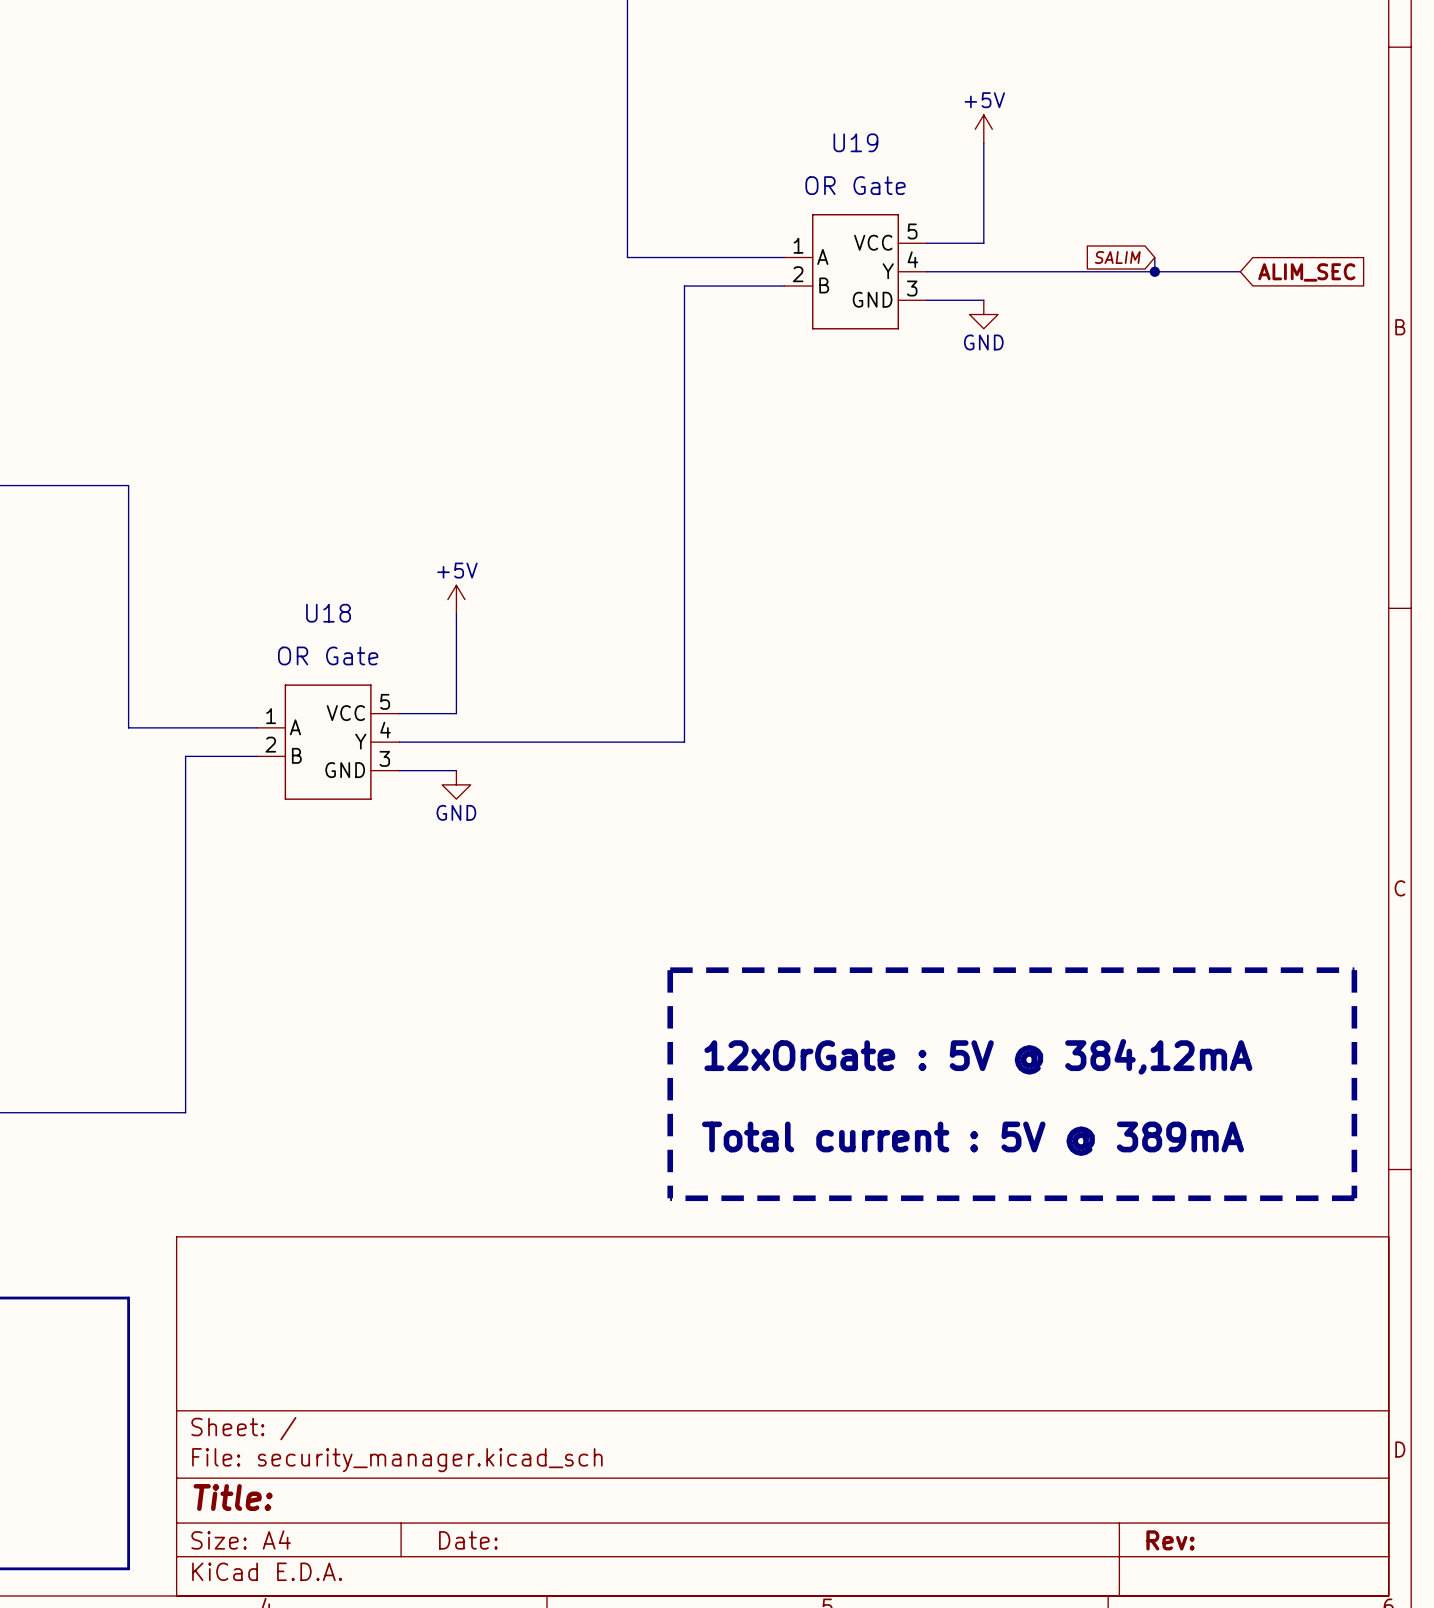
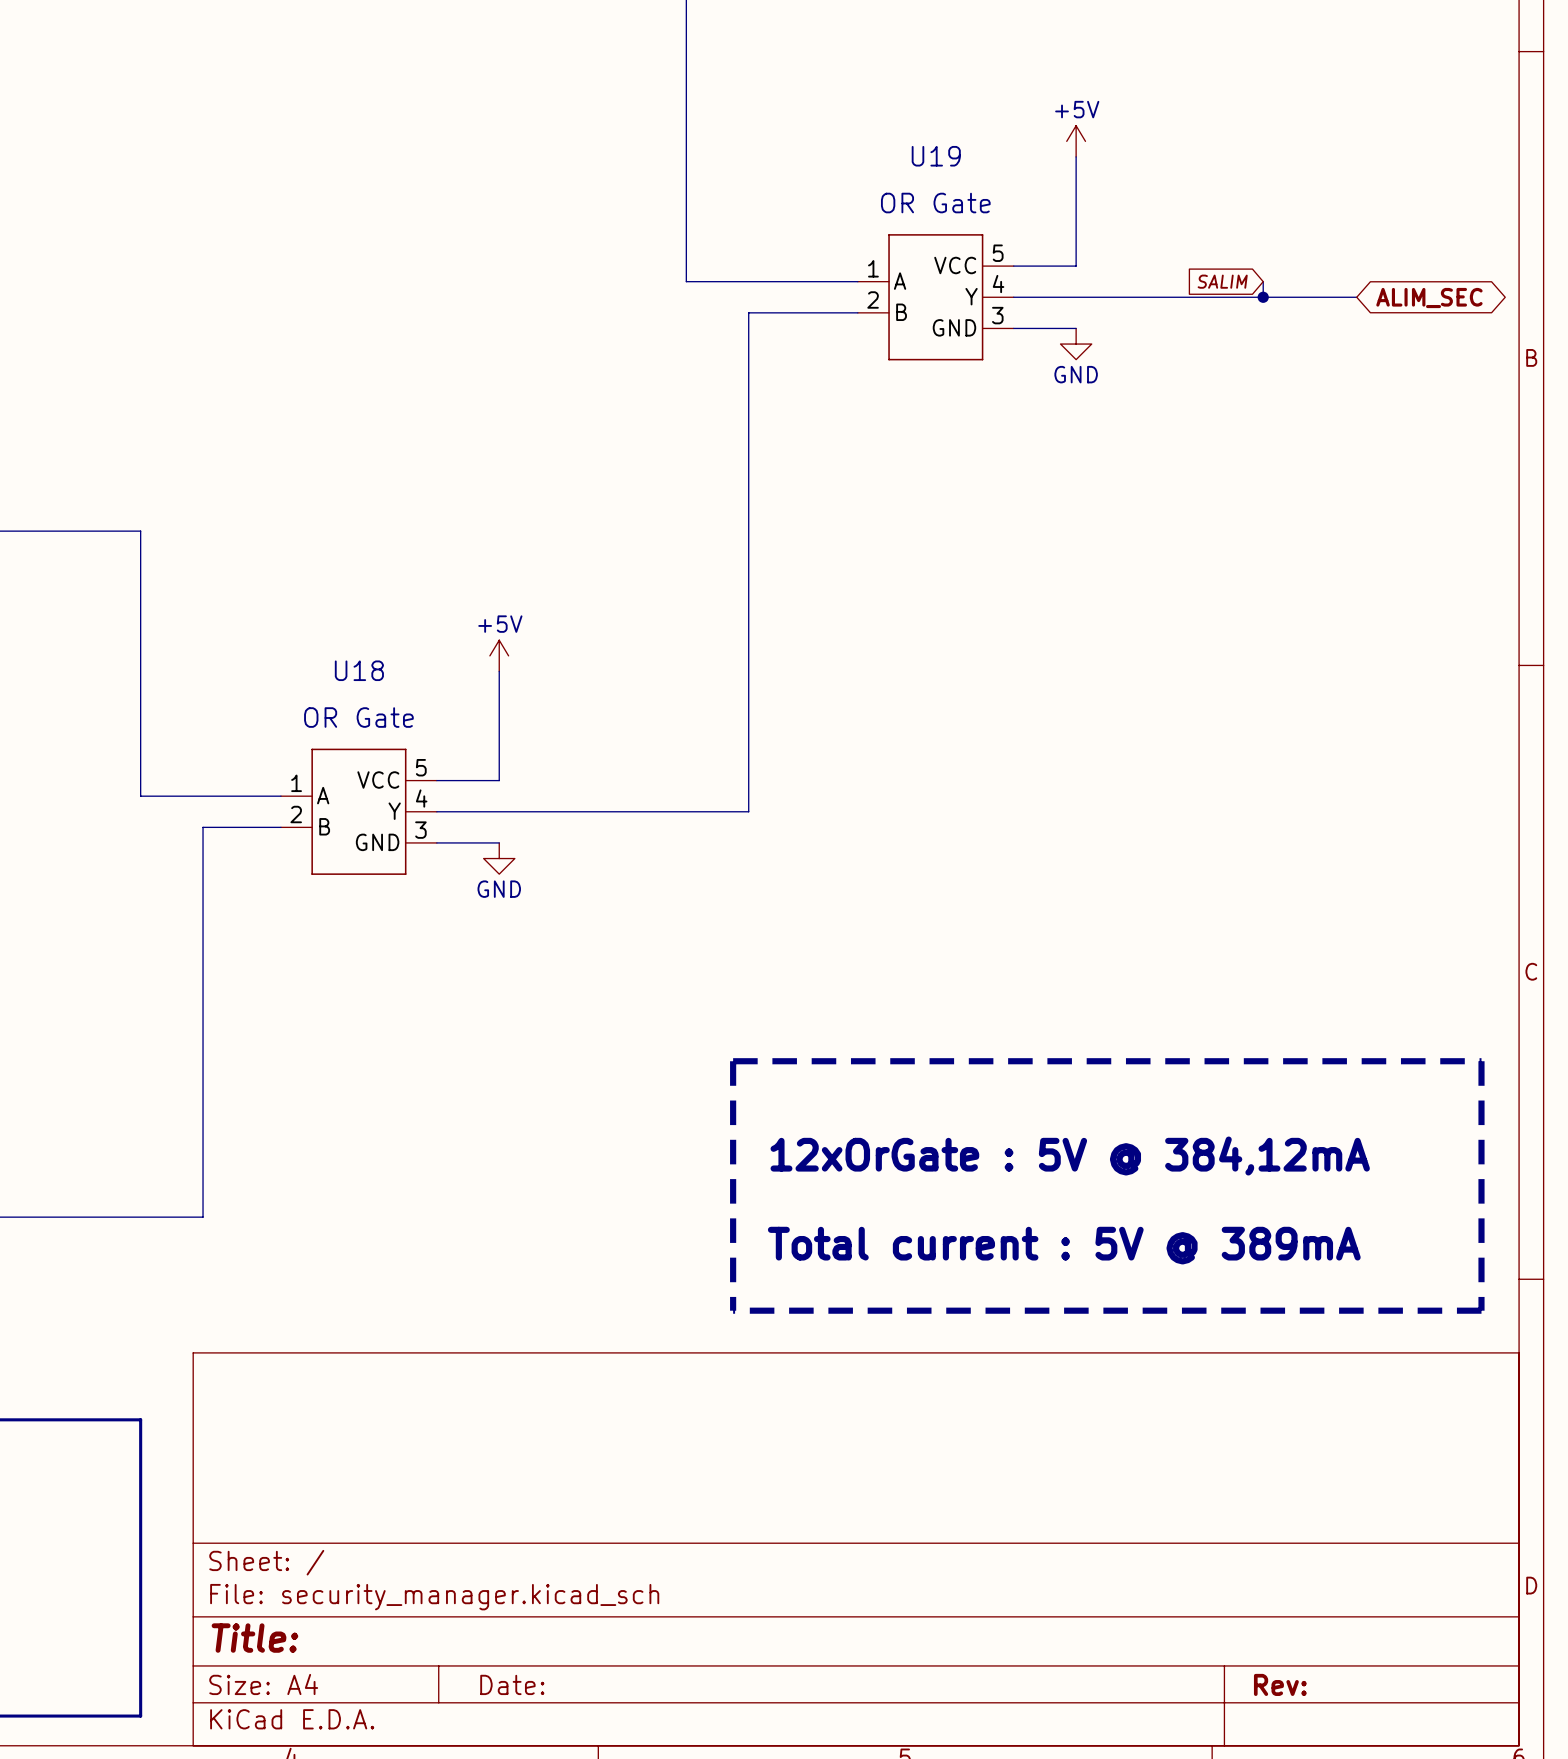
global label shape: input (1306, 272) -> bidirectional (1429, 298)

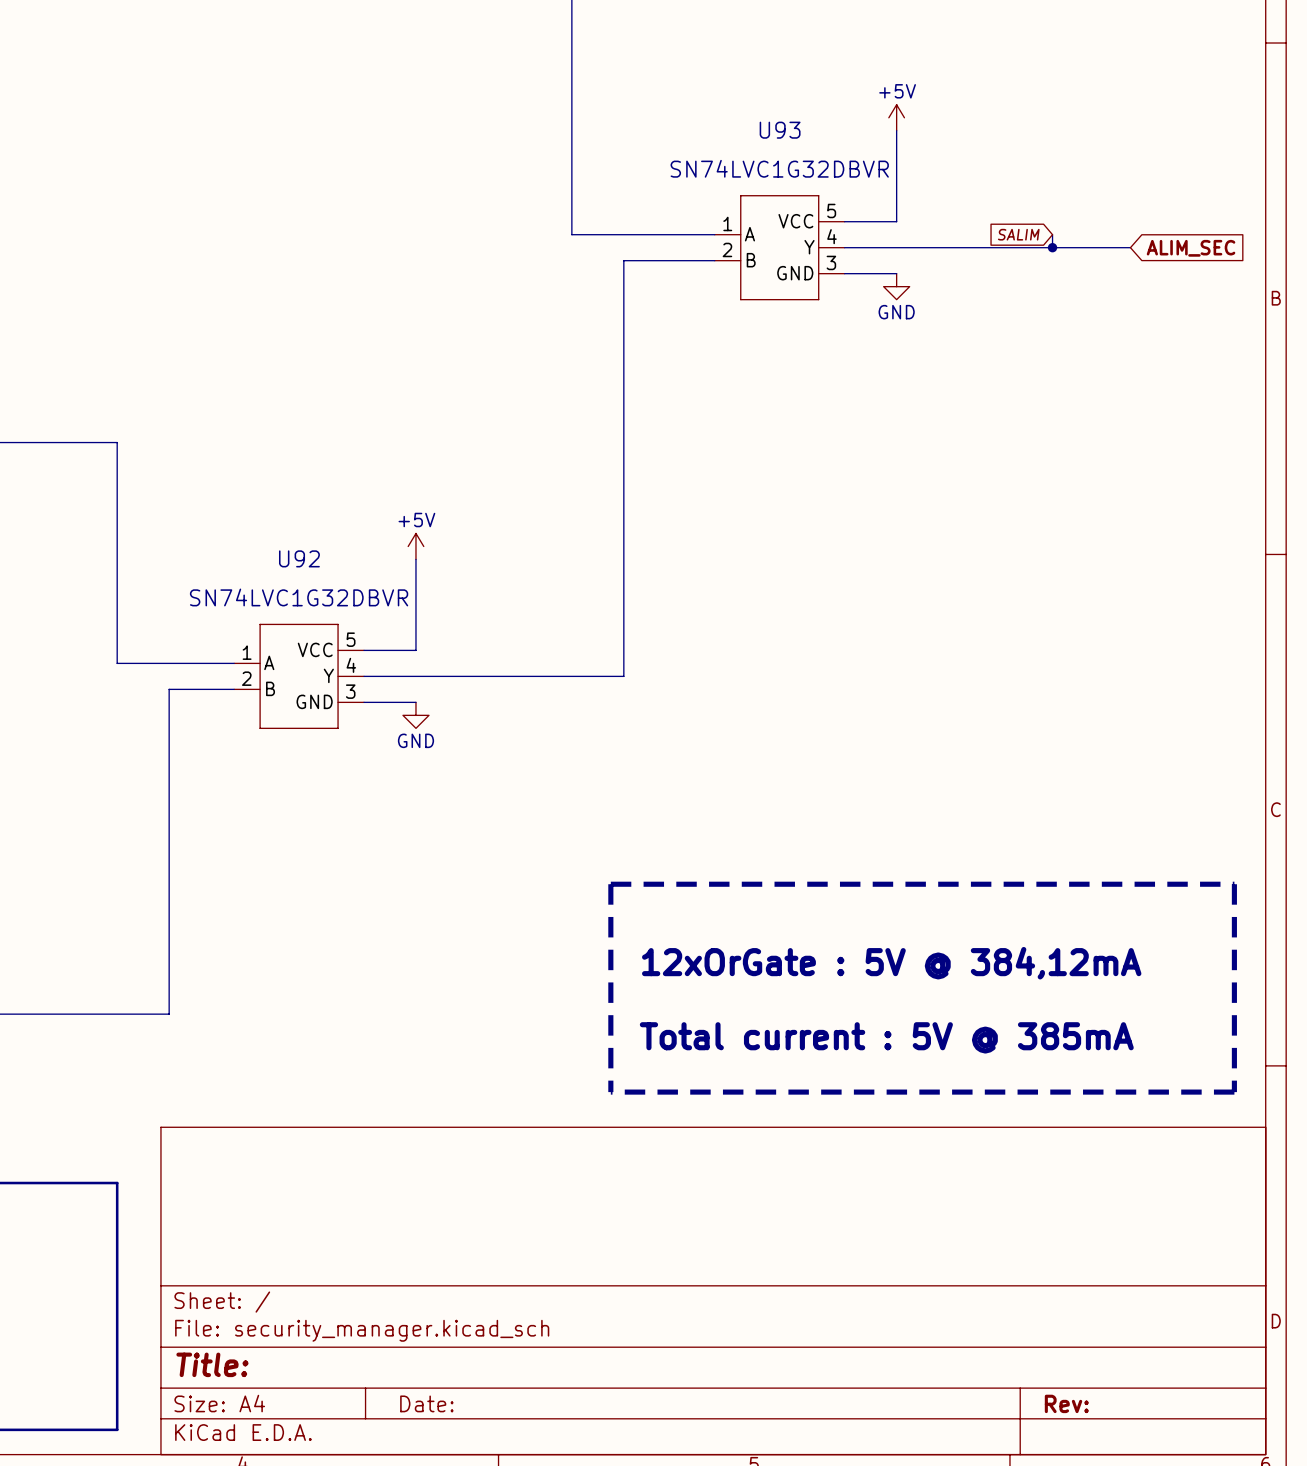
U19 name: U19 (936, 156) -> U93 (780, 130)
U19 value: OR Gate (935, 203) -> SN74LVC1G32DBVR (779, 168)
global label shape: bidirectional (1429, 298) -> input (1191, 248)
U18 name: U18 (359, 670) -> U92 (299, 558)
U18 value: OR Gate (358, 717) -> SN74LVC1G32DBVR (299, 597)
text: Total current : 5V @ 389mA (1064, 1245) -> Total current : 5V @ 385mA (886, 1037)

